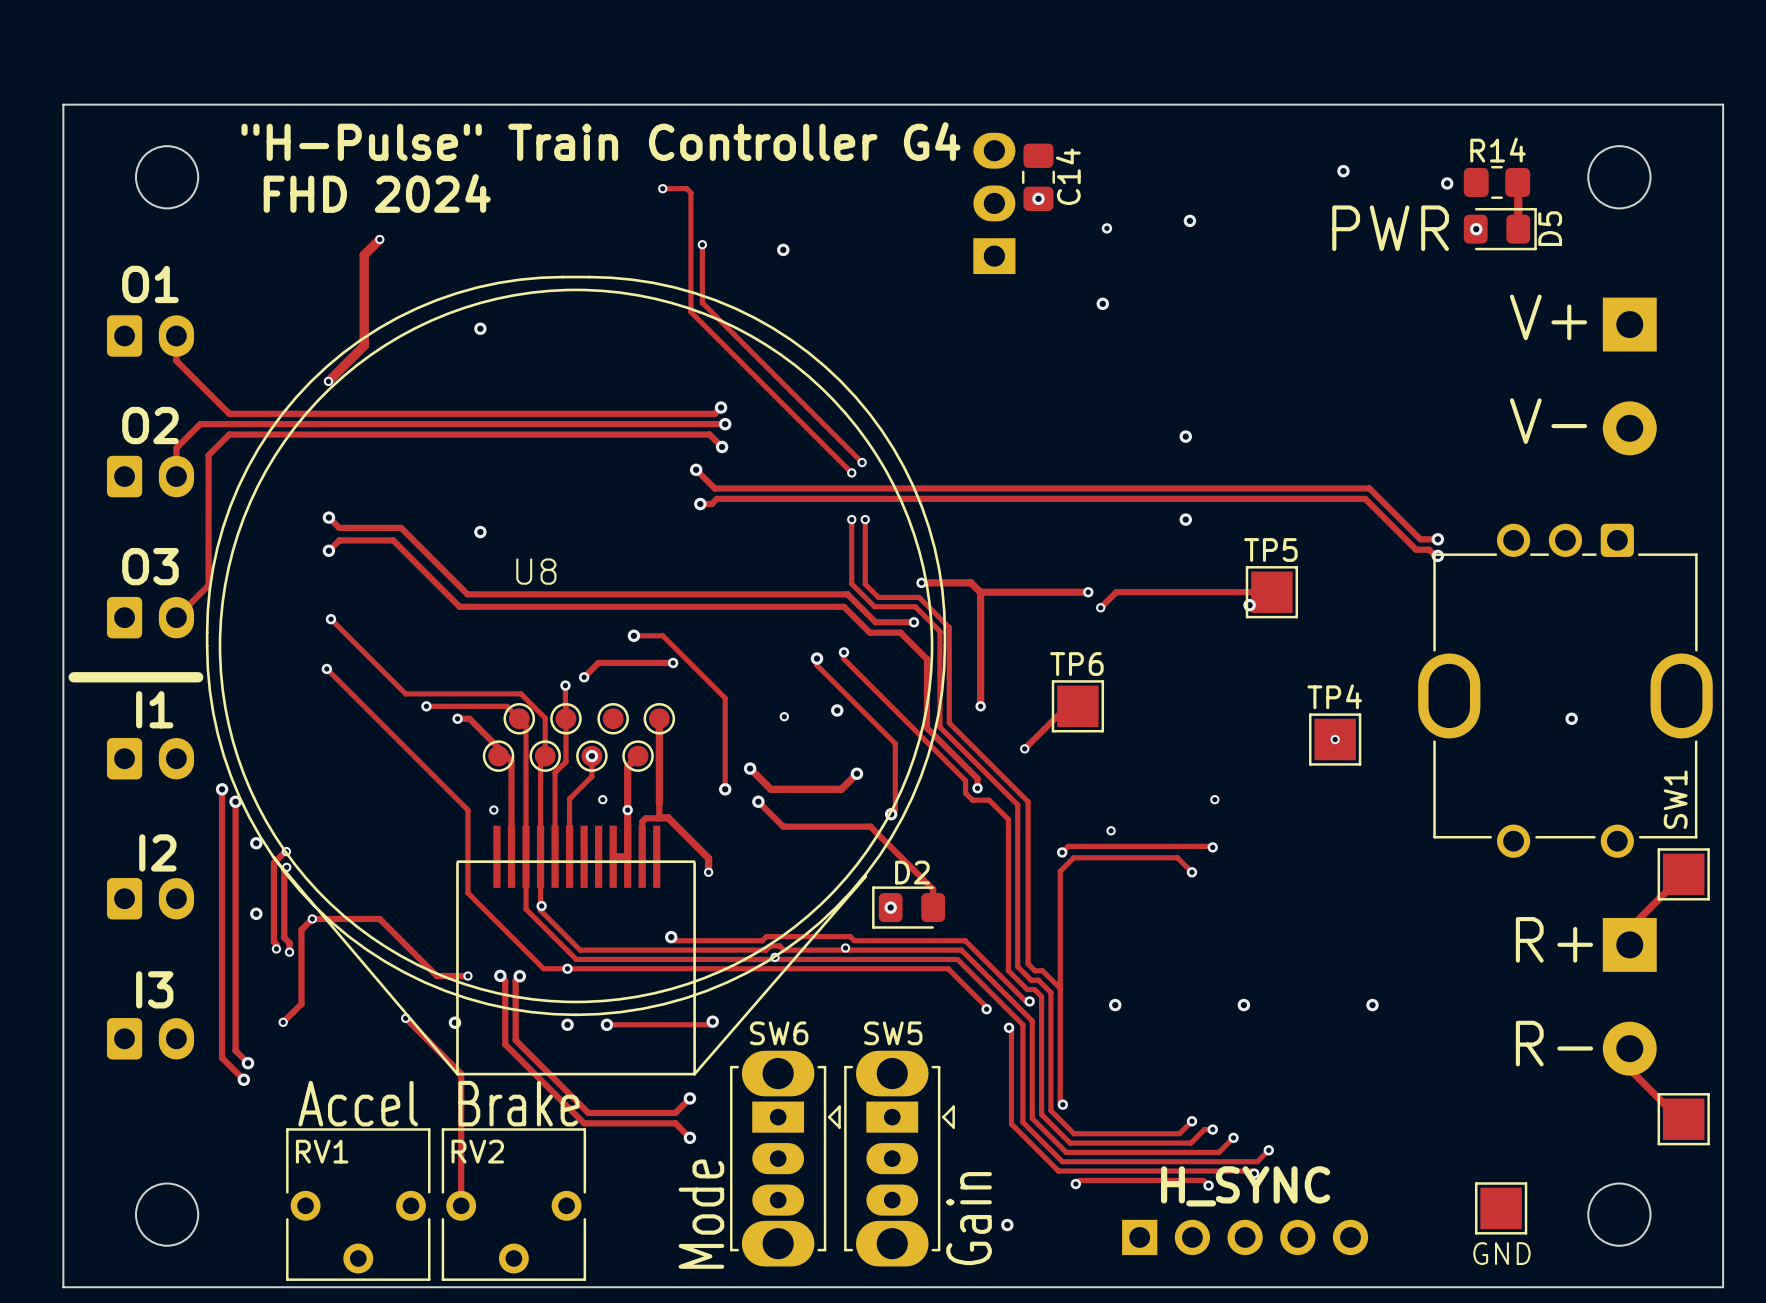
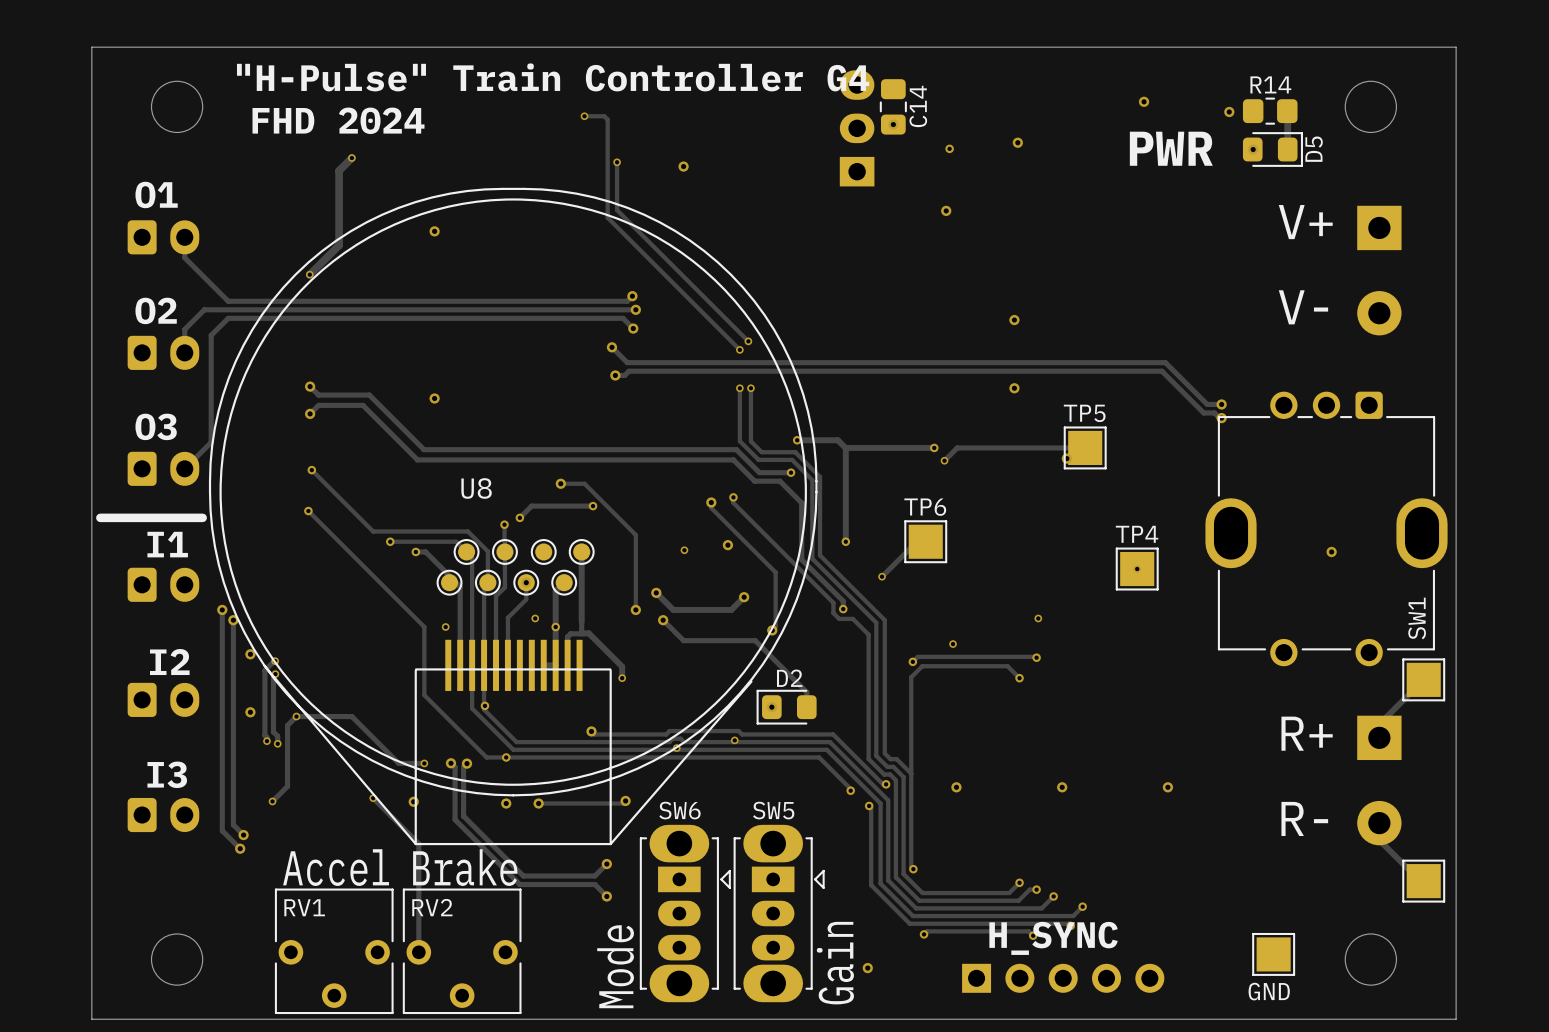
U8 name position: U8 (536, 571) -> U8 (476, 488)

